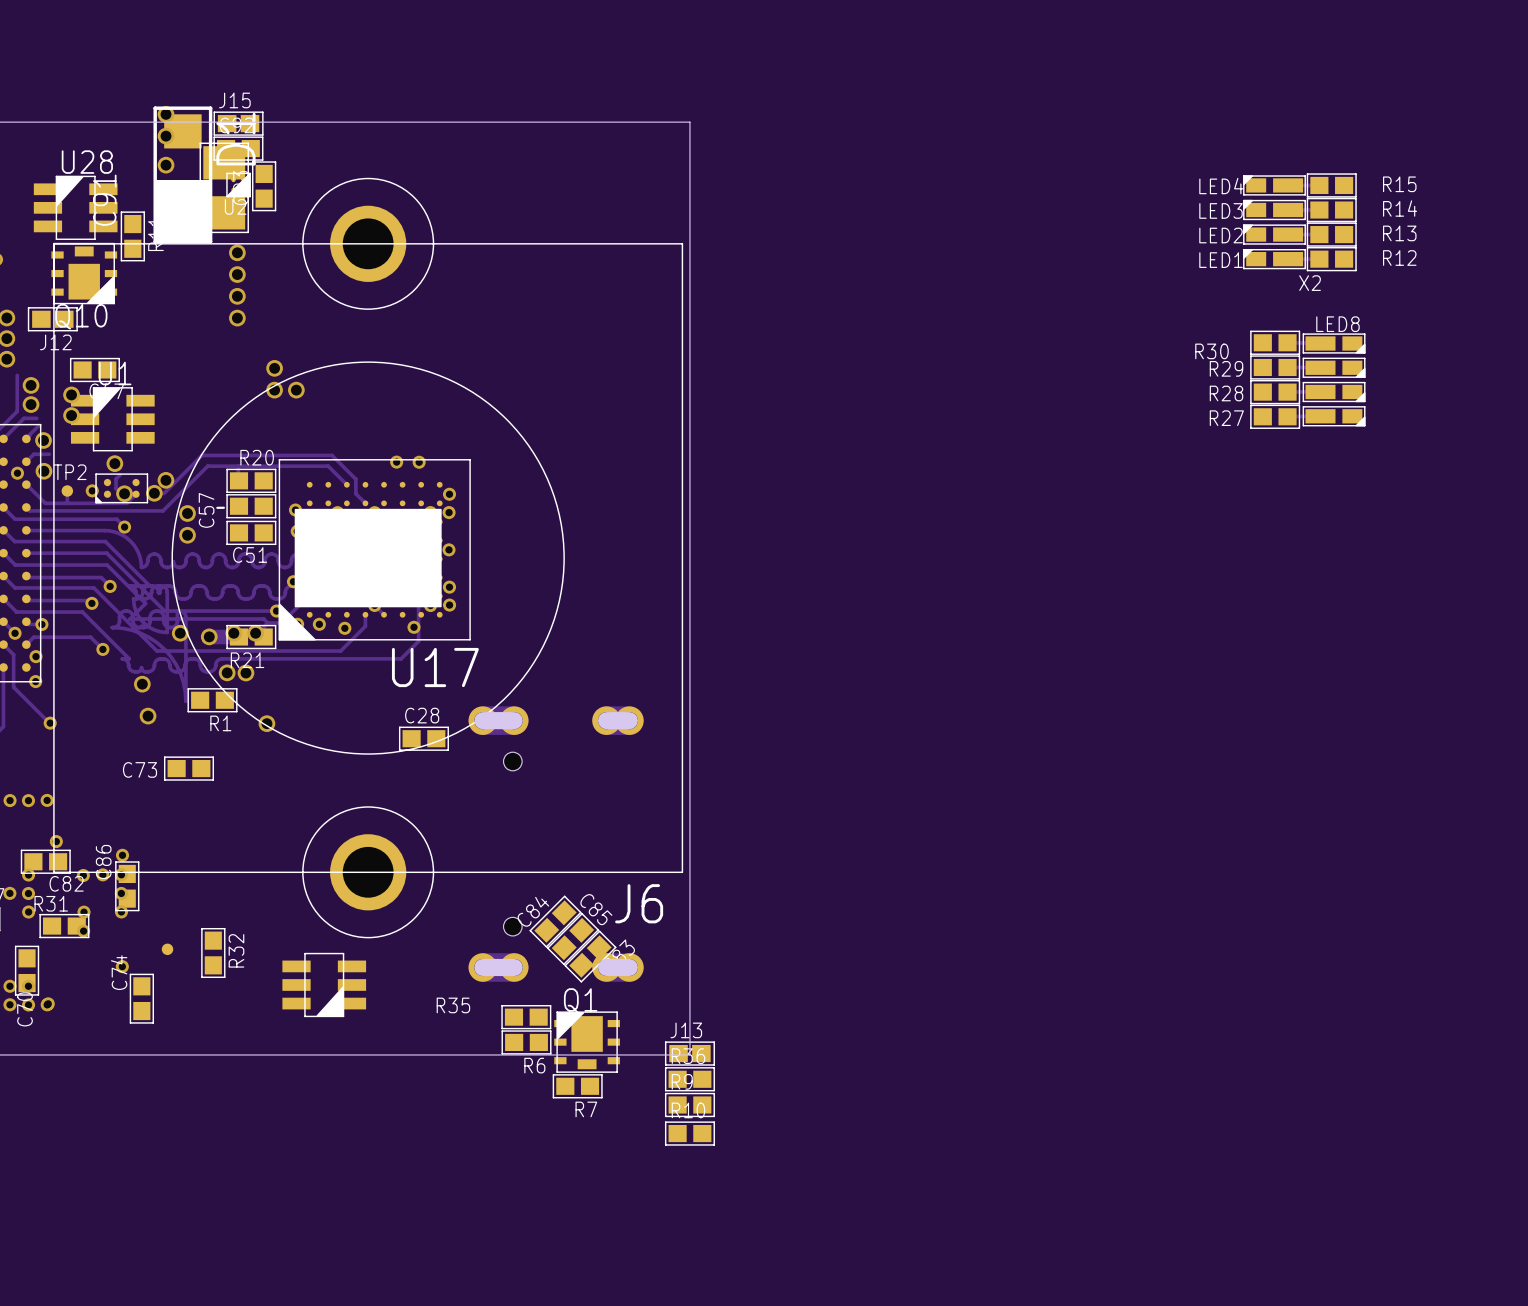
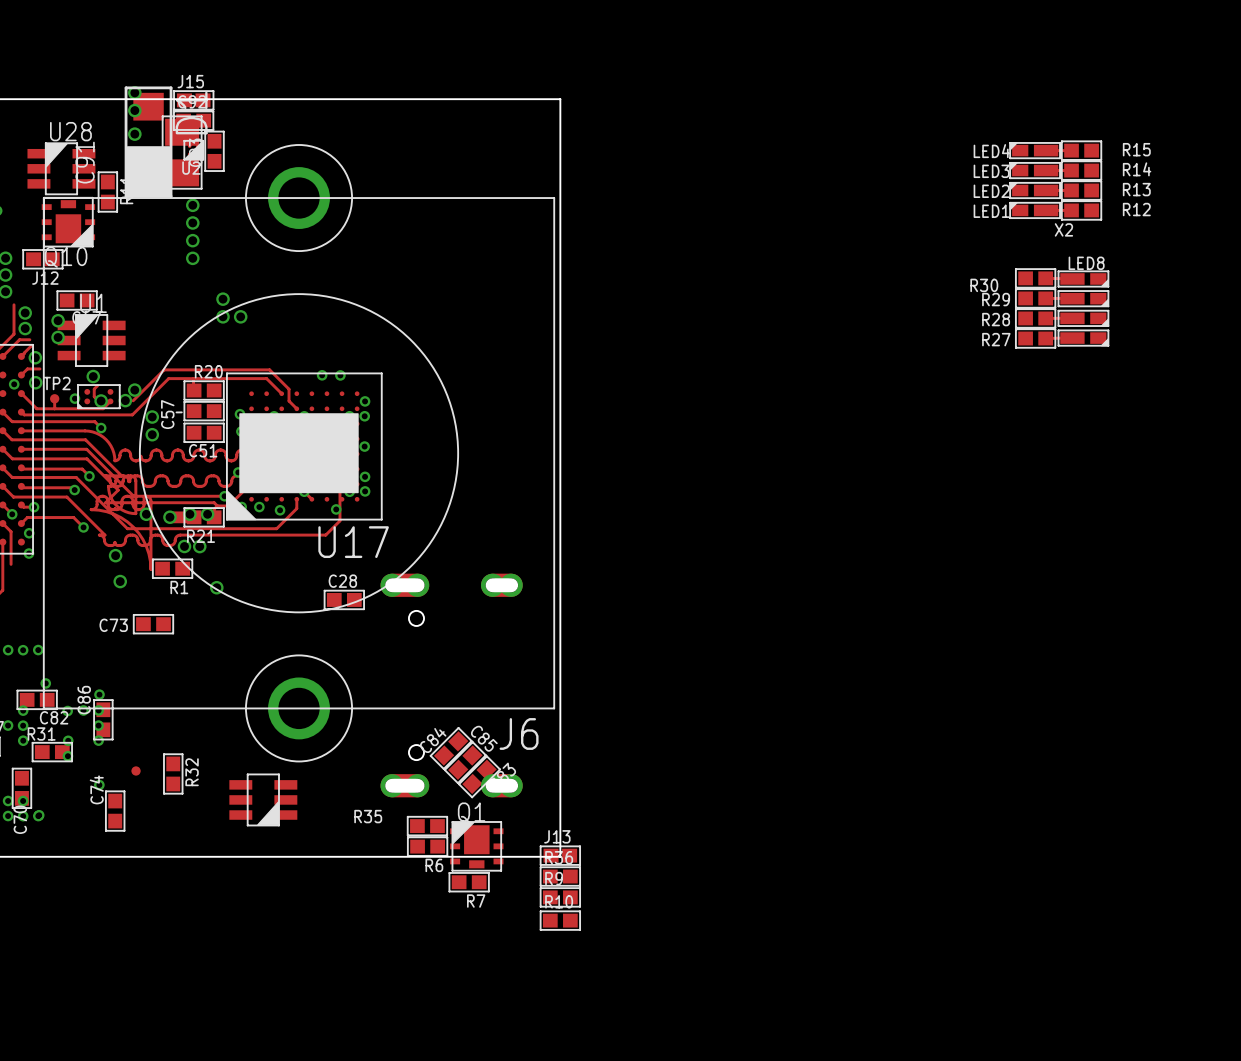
track: (13, 687) (50, 723) -> (11, 558) (11, 564)
via: (50, 723) -> none

